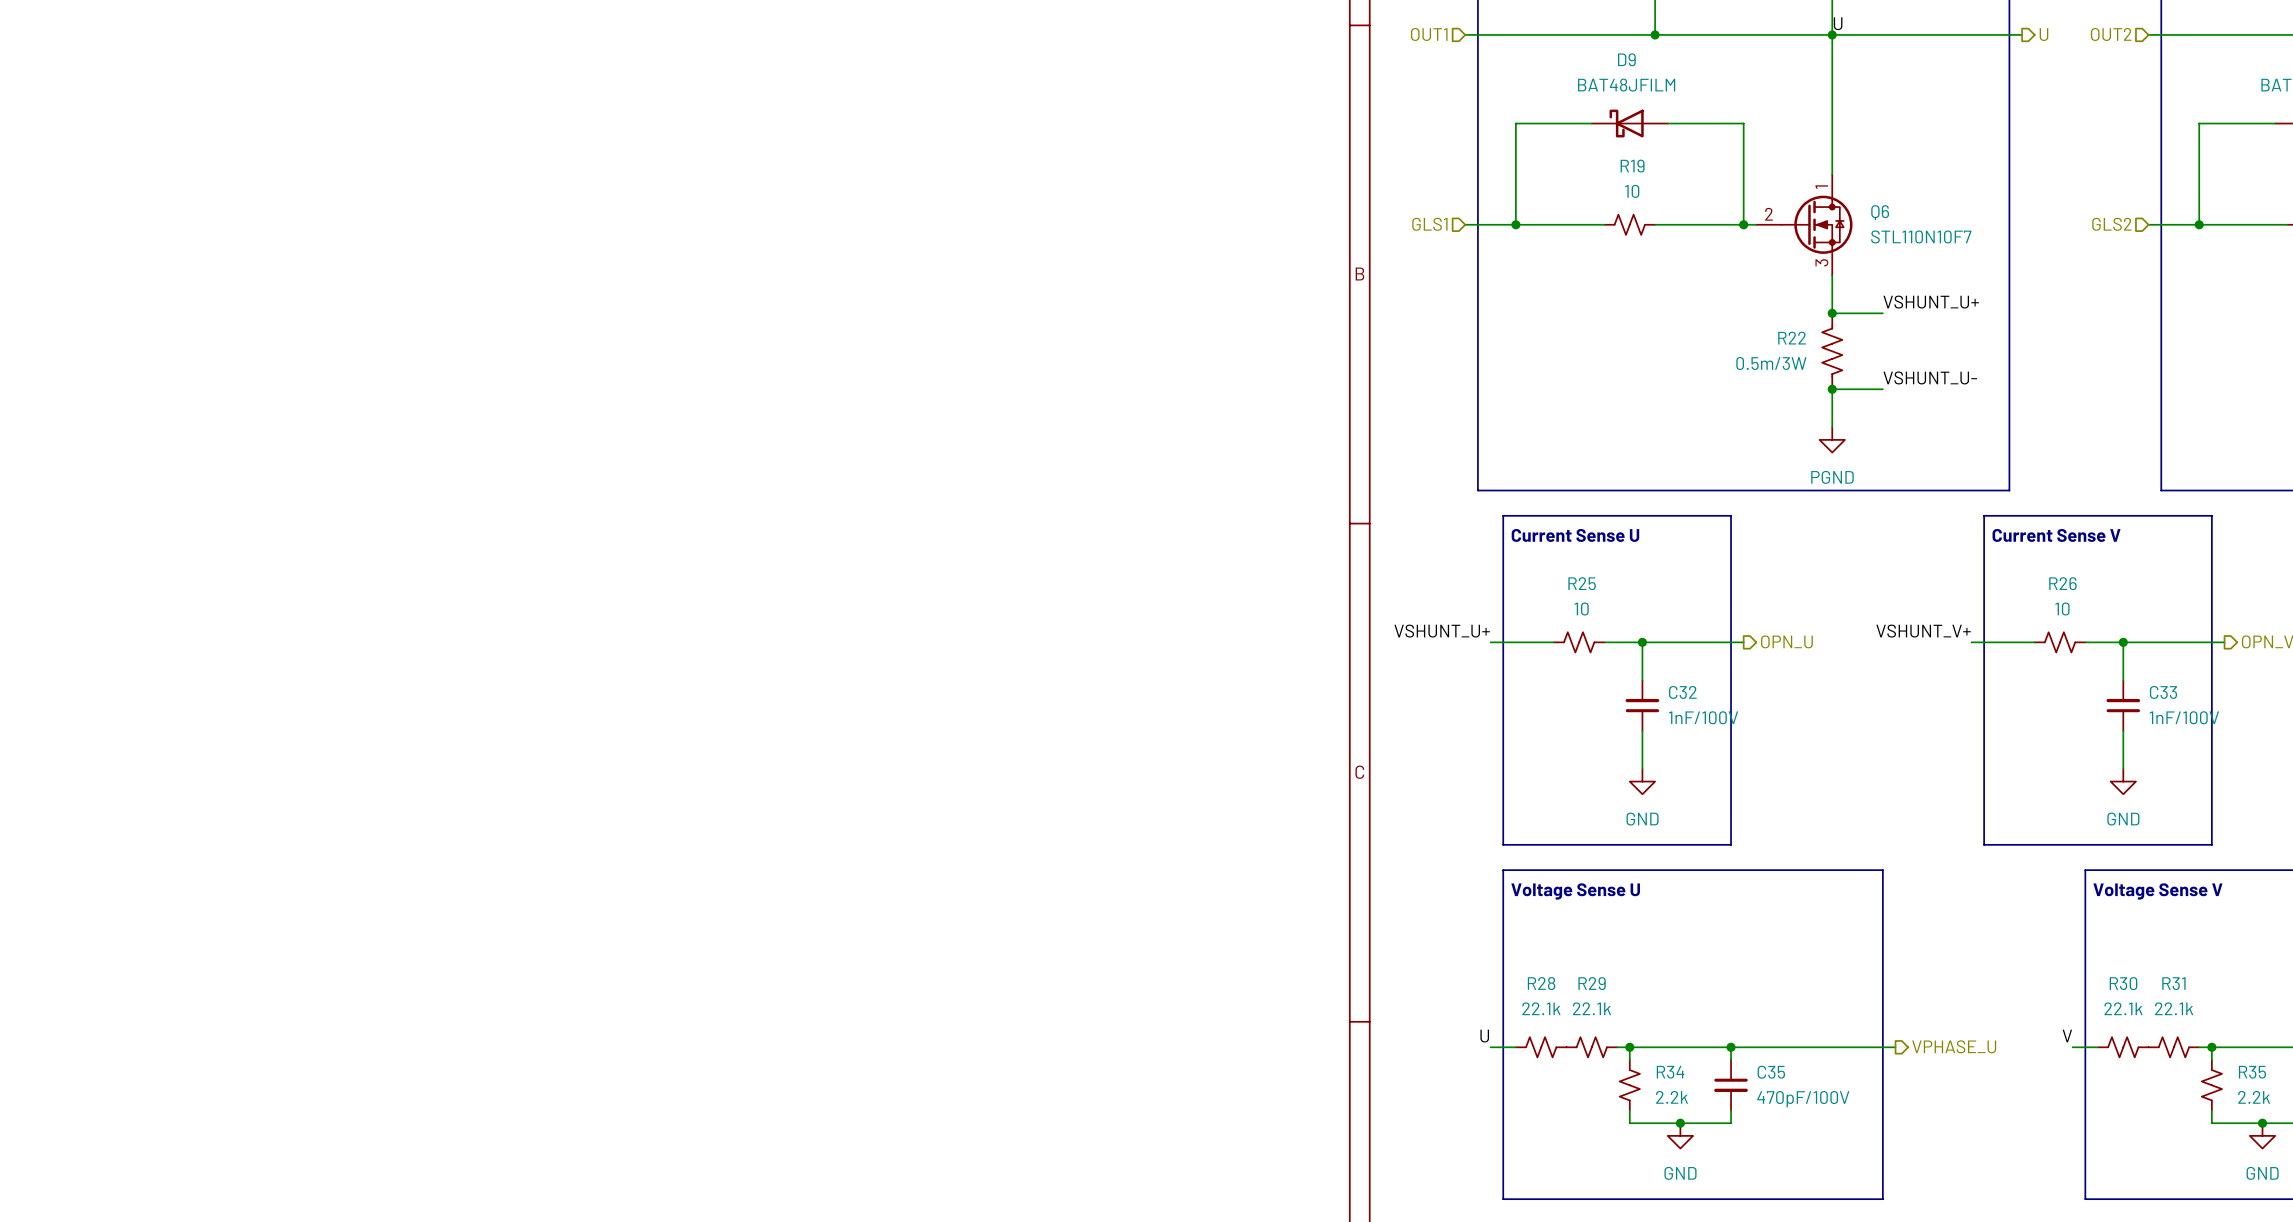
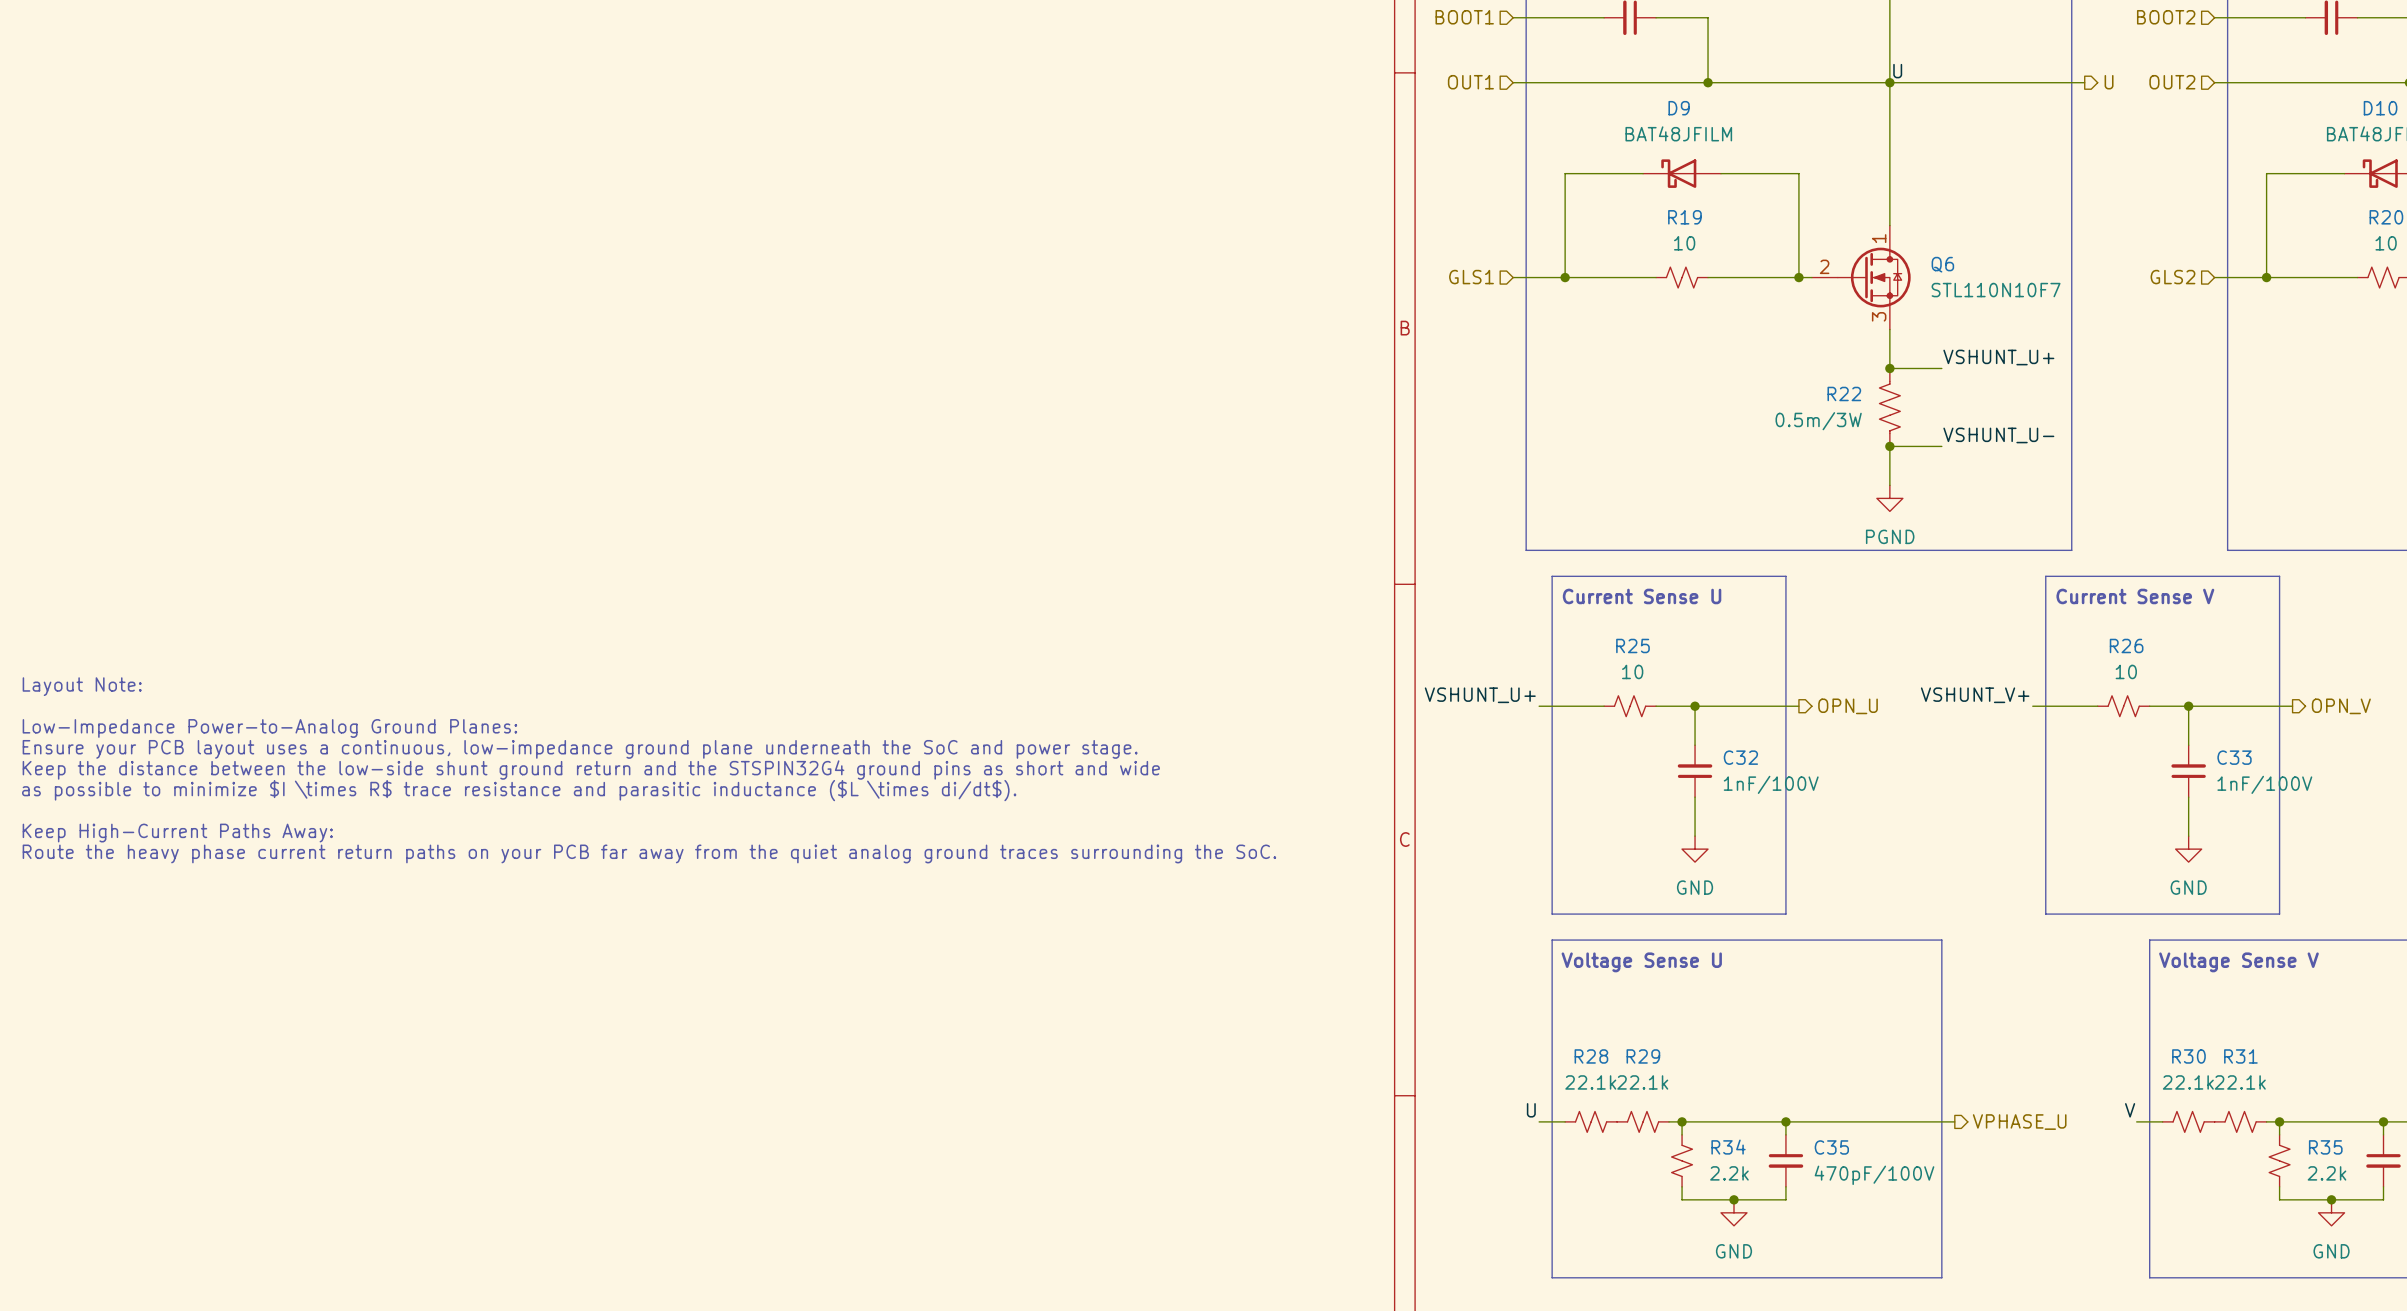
text: none -> Layout Note: (82, 686)
text: none -> Low-Impedance Power-to-Analog Ground Planes: (269, 728)
text: none -> Ensure your PCB layout uses a continuous, low-impedance ground plane underneath the SoC and power stage. (580, 749)
text: none -> Keep the distance between the low-side shunt ground return and the STSPIN32G4 ground pins as short and wide (591, 769)
text: none -> as possible to minimize $I \times R$ trace resistance and parasitic inductance ($L \times di/dt$). (519, 790)
text: none -> Keep High-Current Paths Away: (177, 833)
text: none -> Route the heavy phase current return paths on your PCB far away from the quiet analog ground traces surrounding the SoC. (649, 853)

